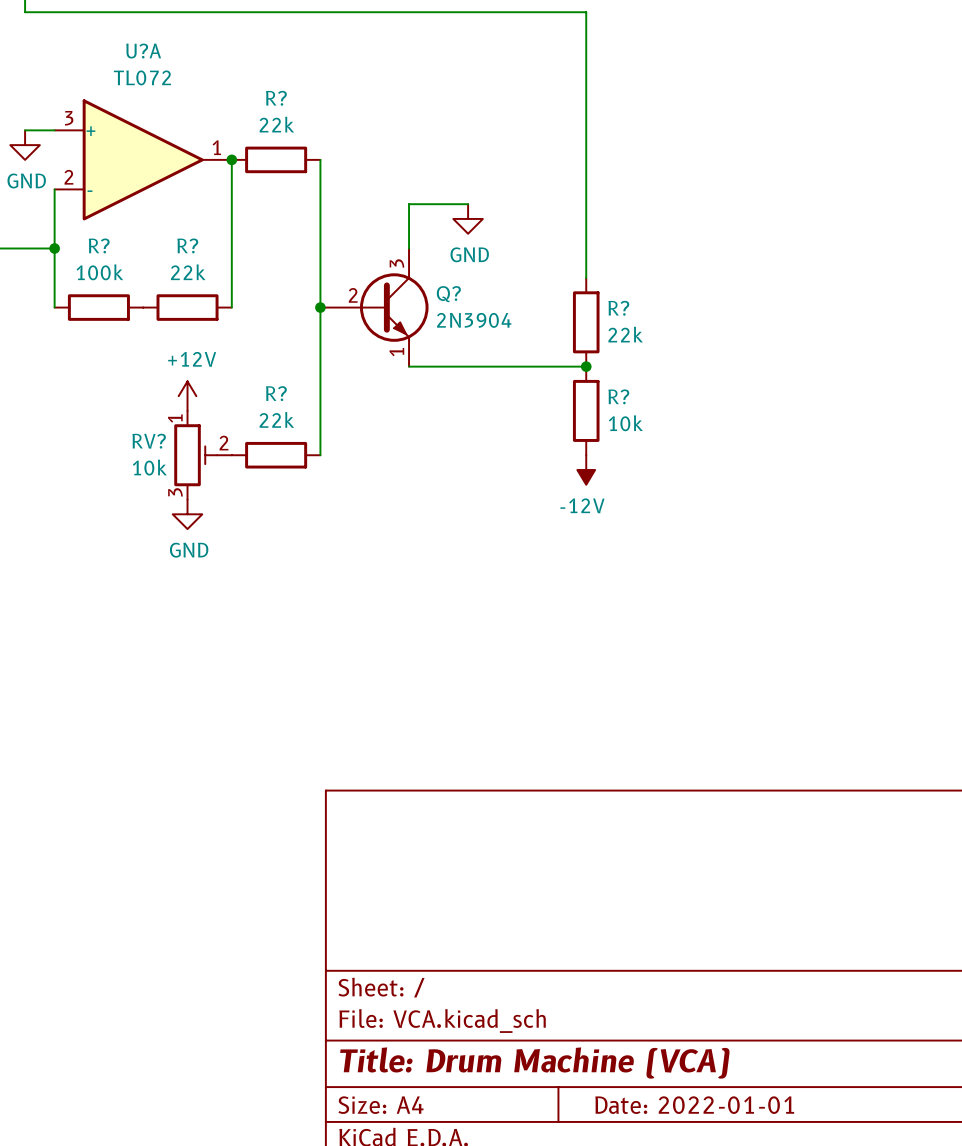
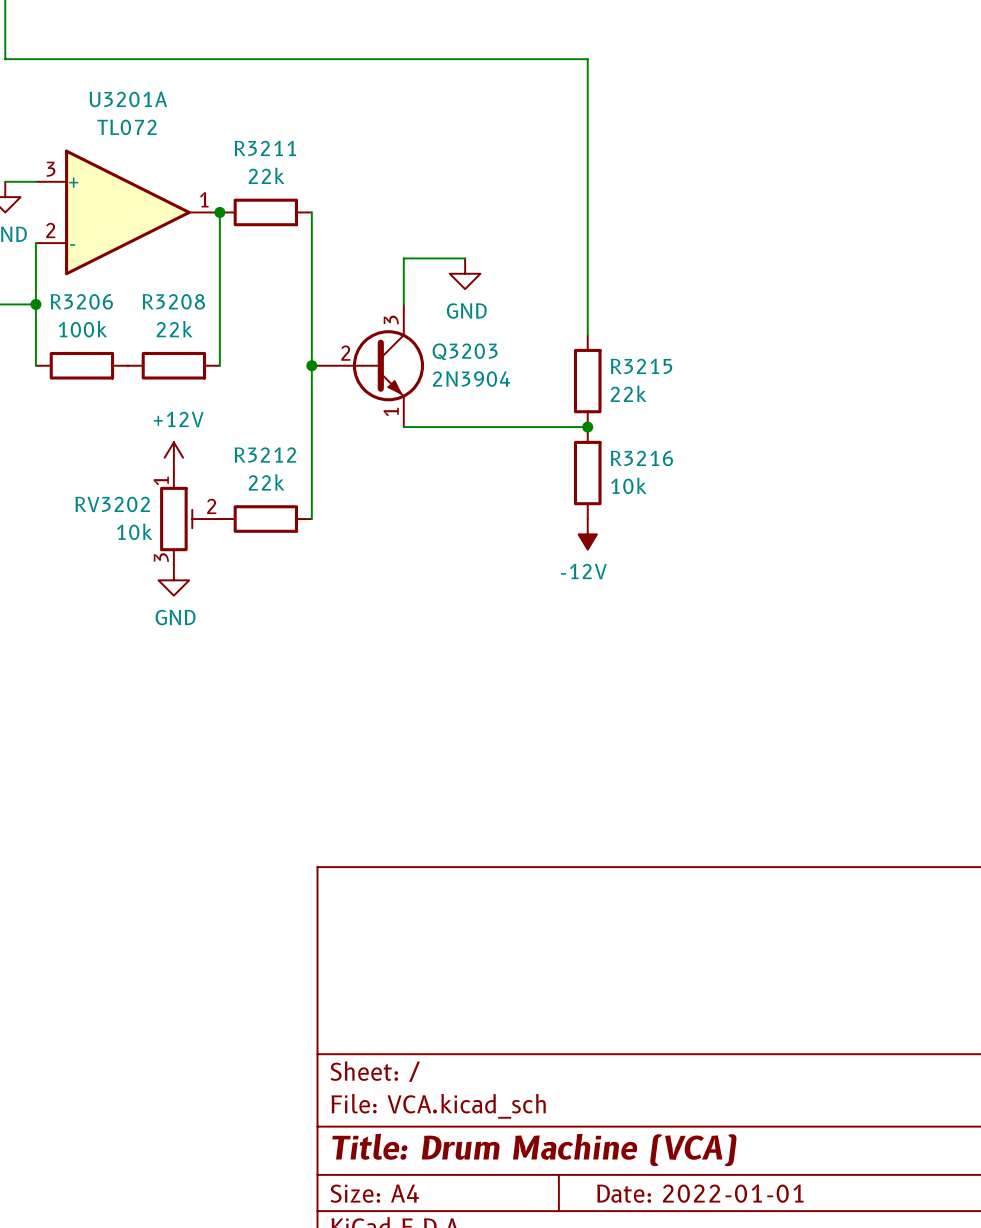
U?A name: U?A (143, 51) -> U3201A (128, 99)
R? name: R? (276, 98) -> R3211 (265, 148)
R? name: R? (99, 245) -> R3206 (81, 301)
R? name: R? (187, 245) -> R3208 (173, 301)
Q? name: Q? (448, 294) -> Q3203 (465, 351)
R? name: R? (618, 308) -> R3215 (641, 366)
R? name: R? (276, 393) -> R3212 (265, 454)
R? name: R? (618, 396) -> R3216 (641, 458)
RV? name: RV? (149, 441) -> RV3202 (112, 504)

